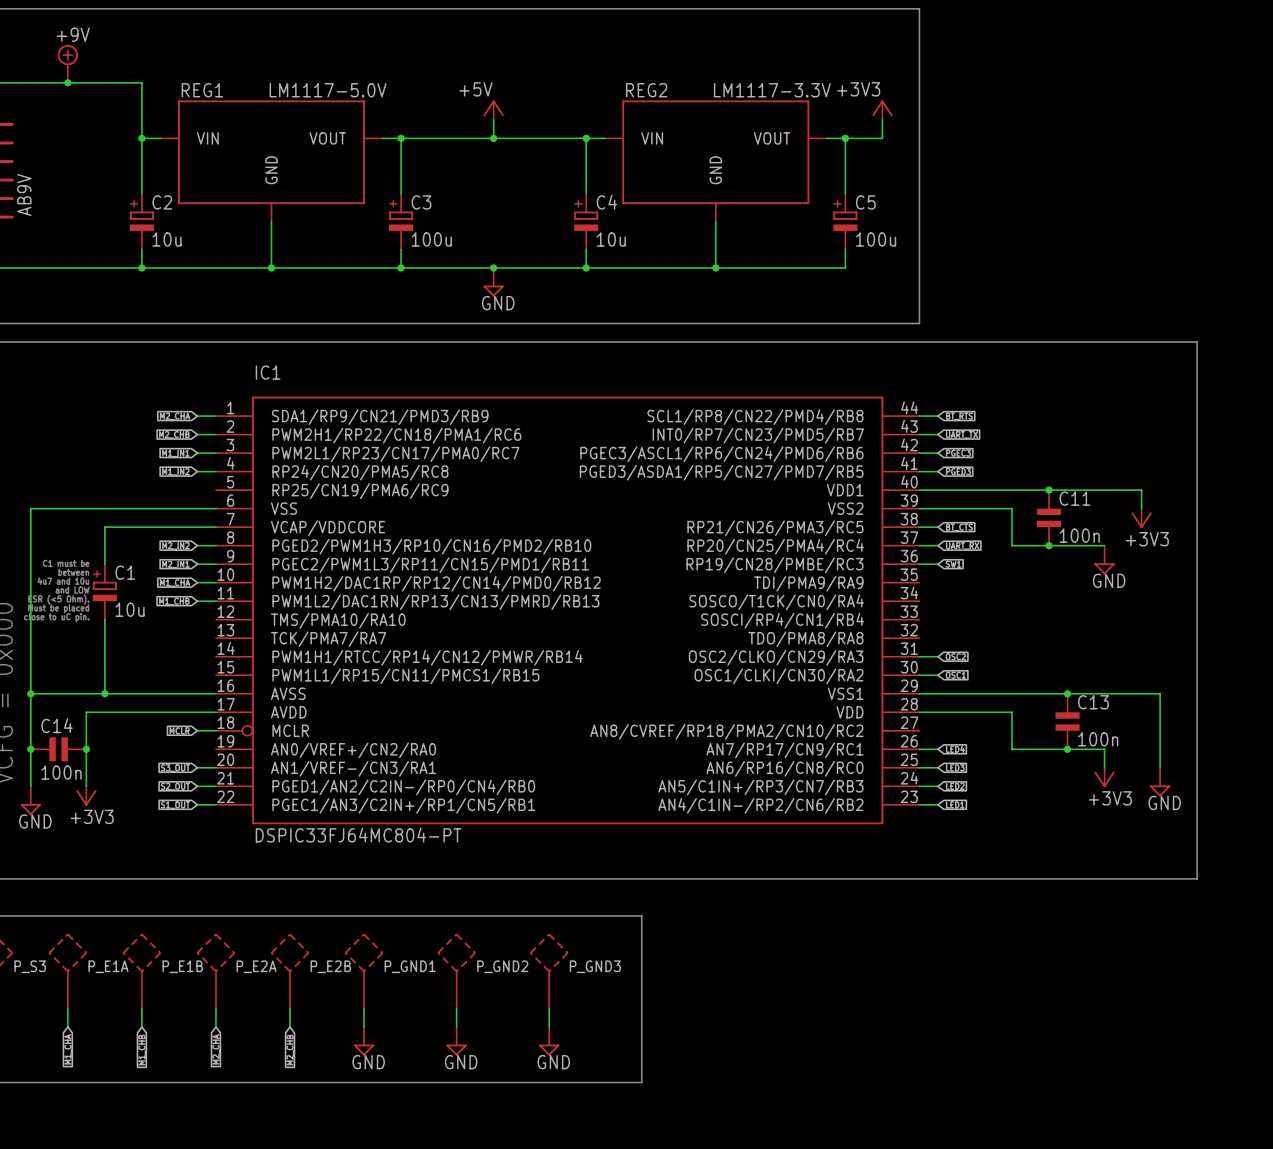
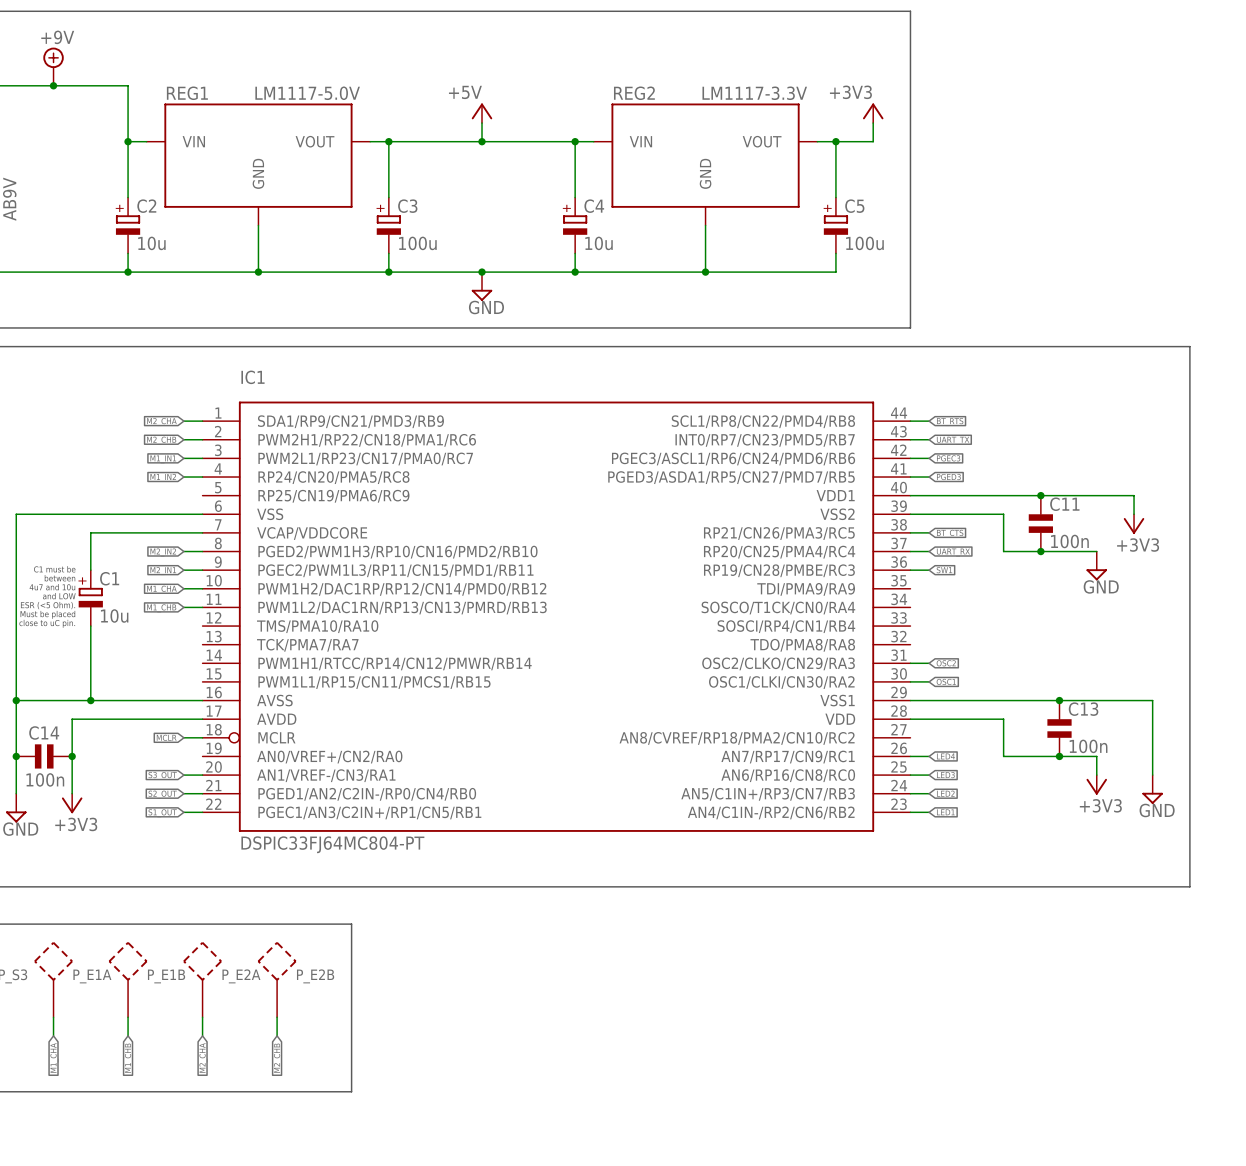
line: (364, 915) (641, 915) (641, 1082) (364, 1082) -> (351, 924) (351, 1091)
P_GND1: (364, 970) -> none
P_GND2: (456, 970) -> none
P_GND3: (549, 970) -> none
wire: (456, 1008) (456, 1026) -> none
wire: (549, 1008) (549, 1026) -> none
power symbol: GND (364, 1041) -> none
power symbol: GND (456, 1041) -> none
power symbol: GND (549, 1041) -> none

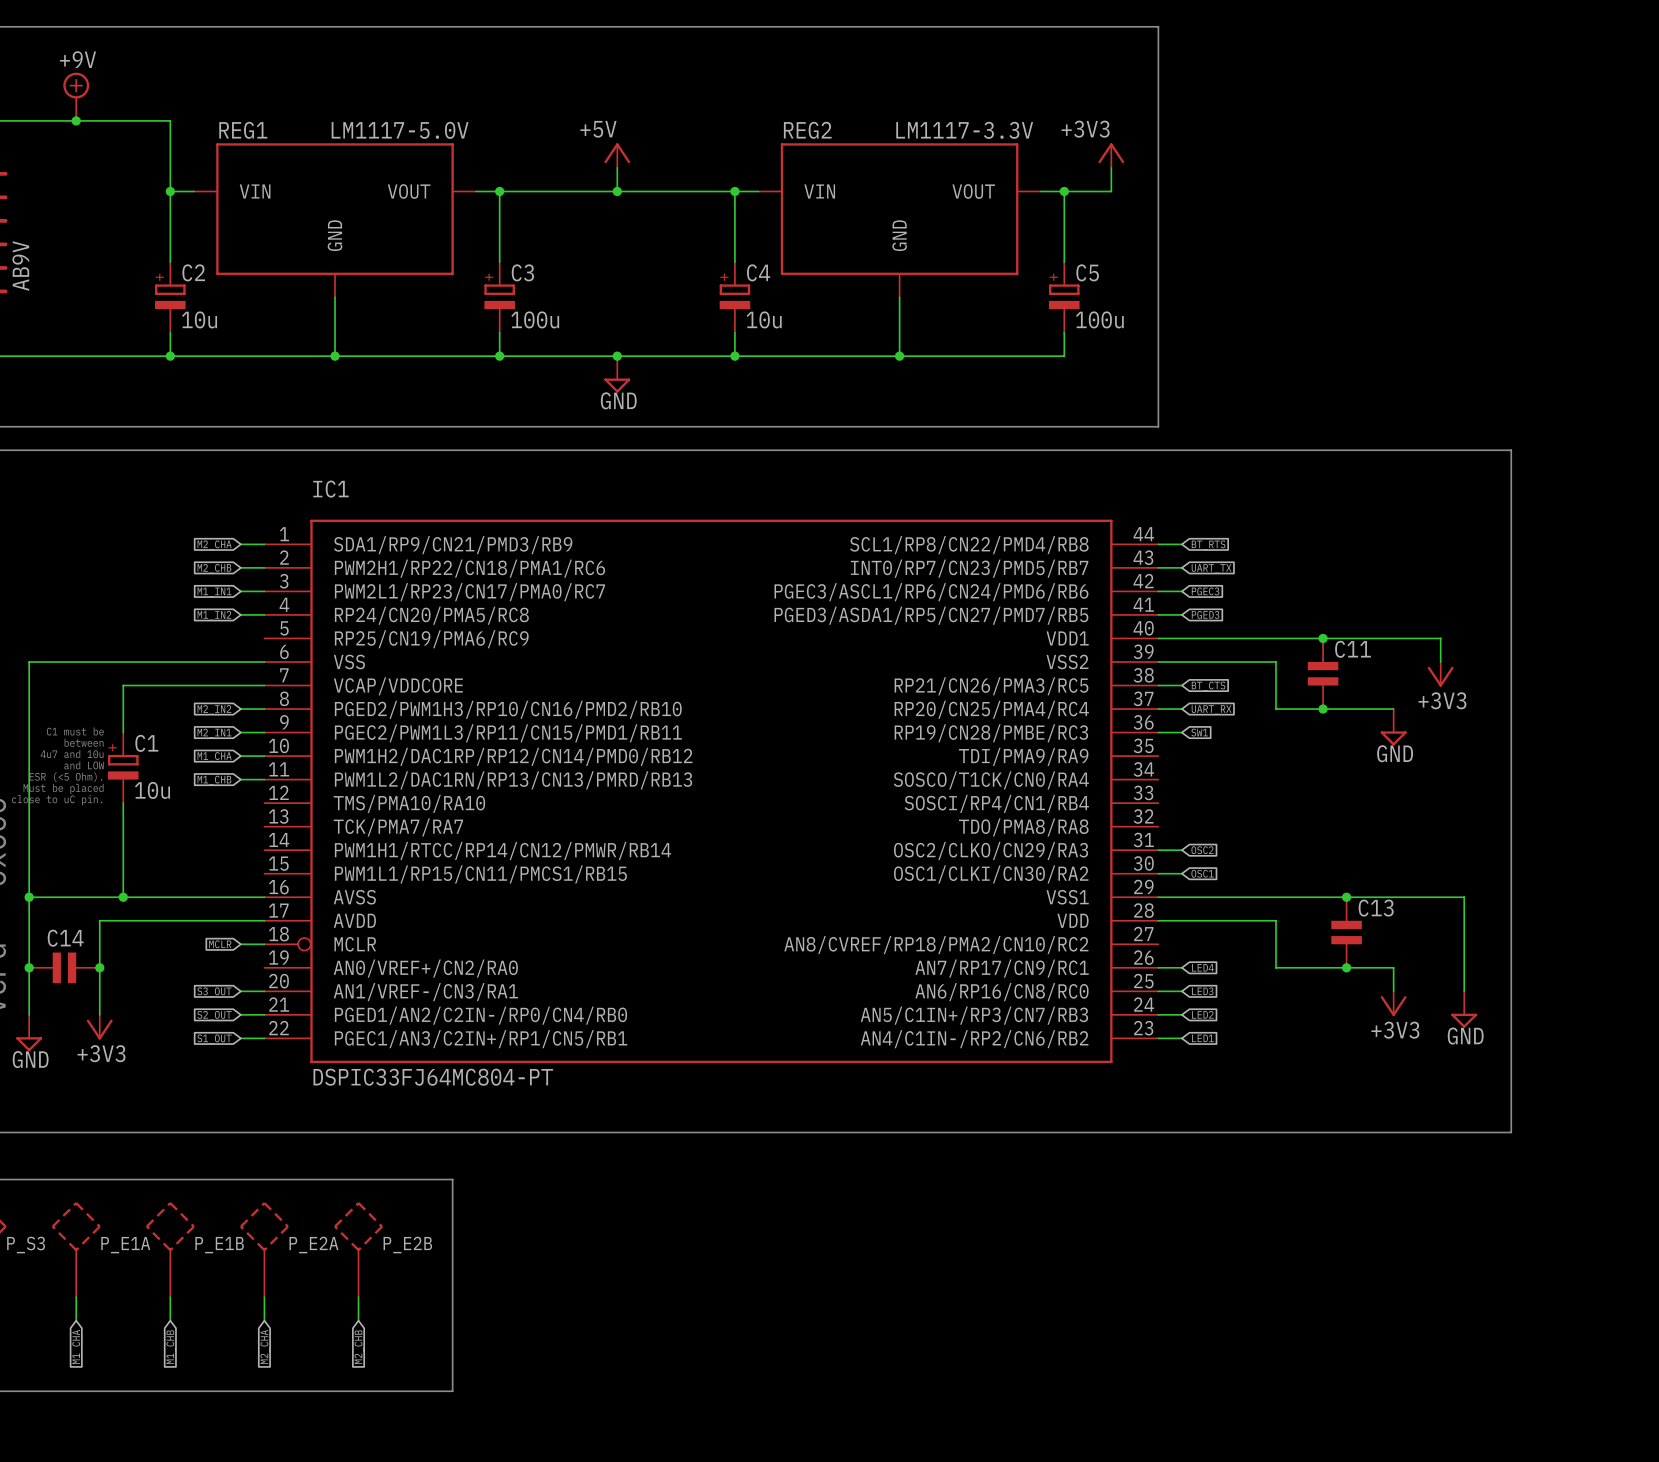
C11 value: 100n (1069, 541) -> none
C13 value: 100n (1088, 746) -> none
C14 value: 100n (45, 779) -> none

